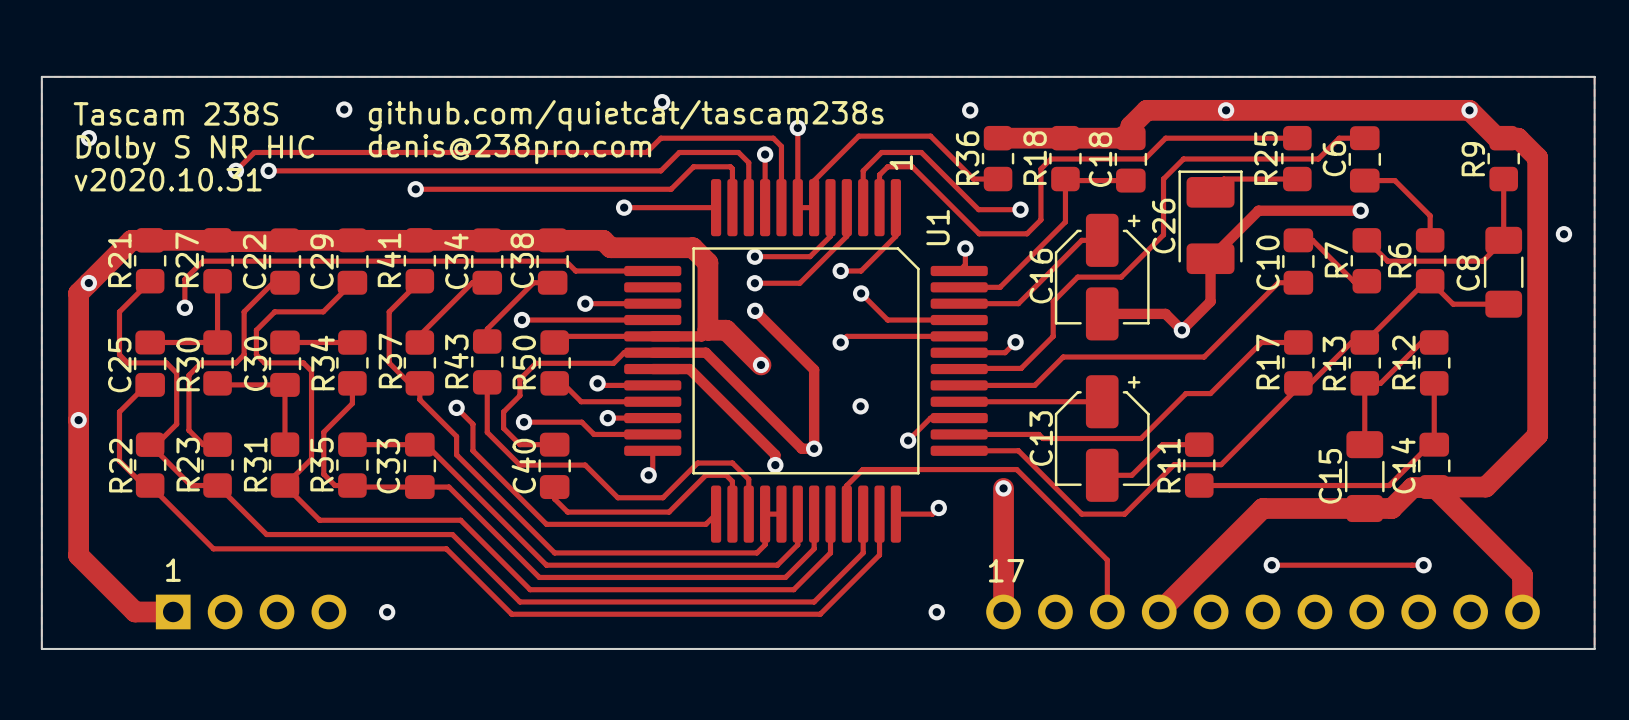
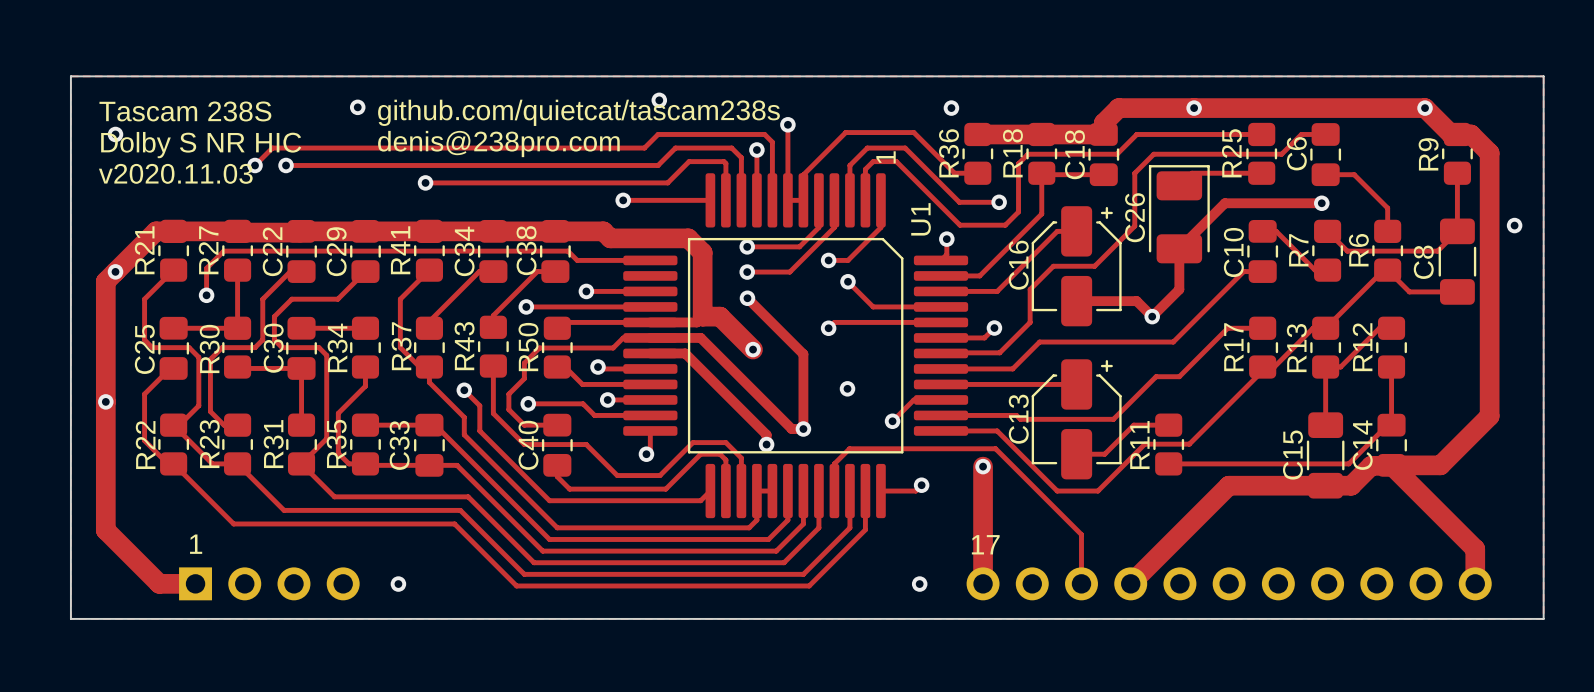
text: v2020.10.31 (168, 179) -> v2020.11.03 (175, 173)
track: (1271, 565) (1423, 565) -> none
via: (1271, 565) -> none
via: (1423, 565) -> none

